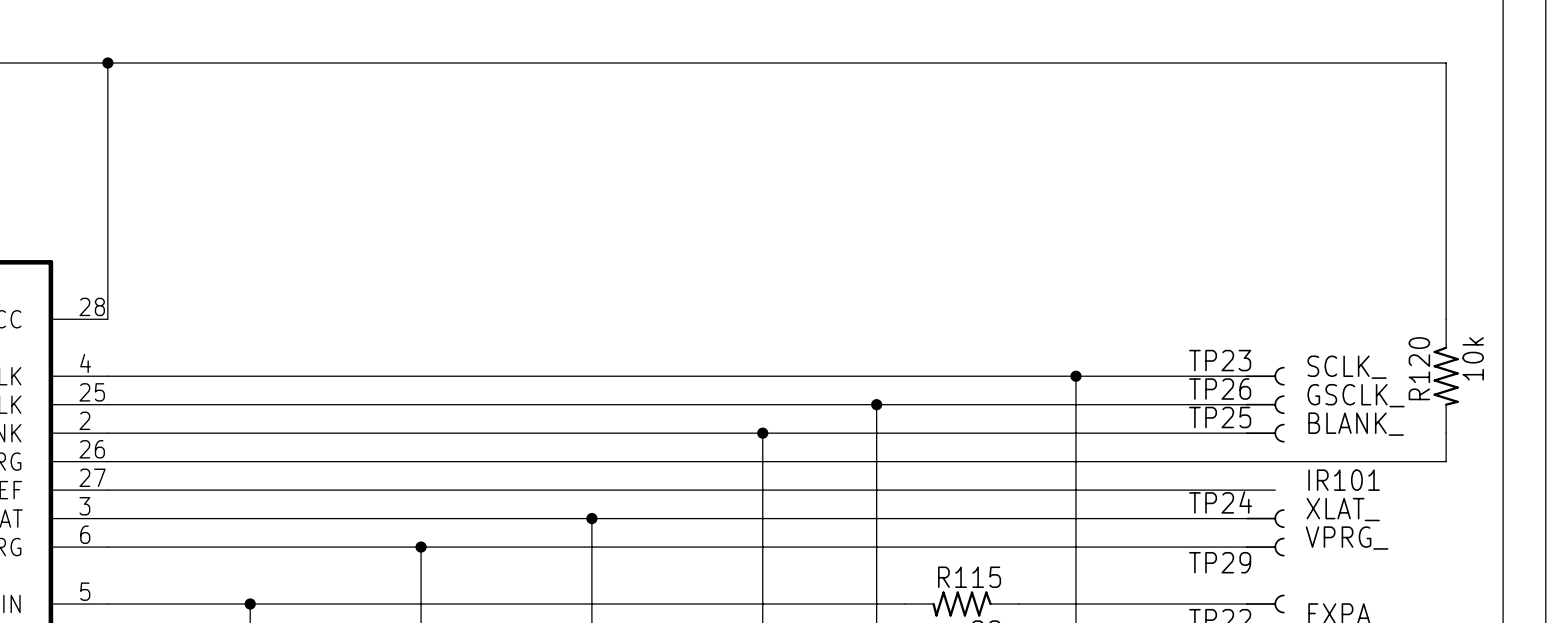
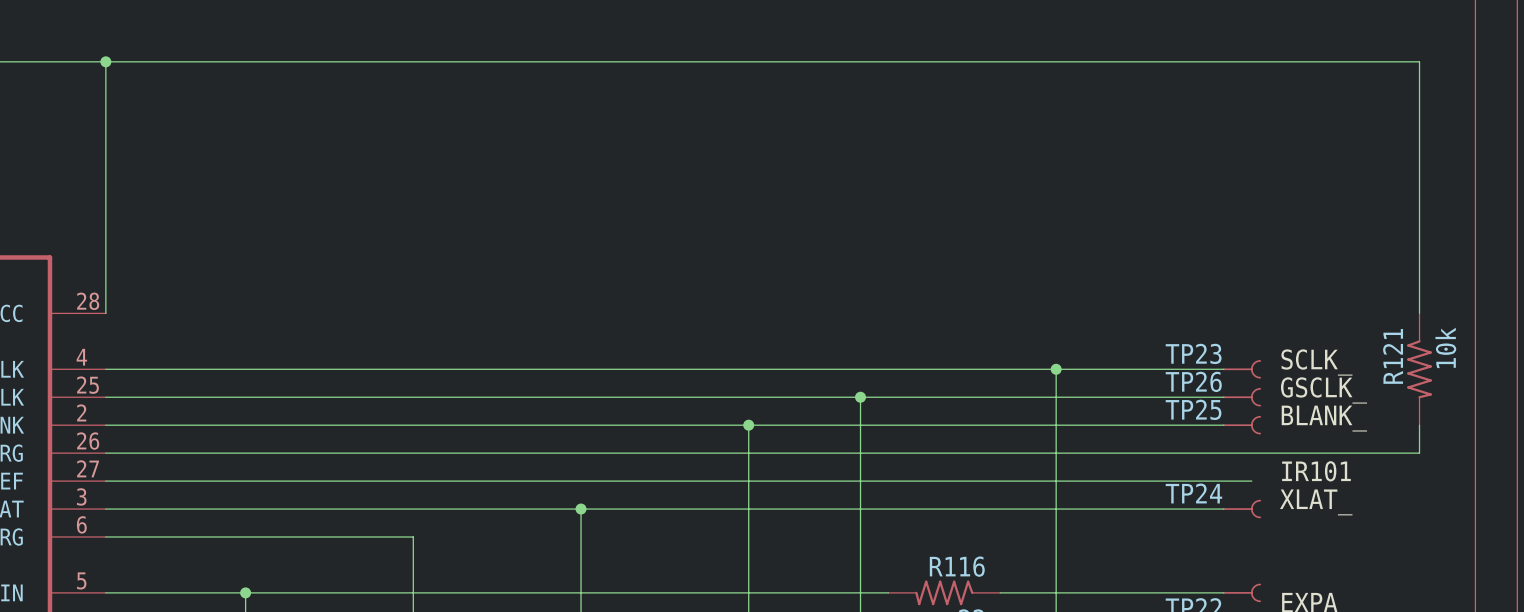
R120 name: R120 (1419, 368) -> R121 (1393, 356)
label: VPRG_ (1347, 538) -> none
wire: (421, 547) (1246, 547) -> none
junction: (421, 547) -> none
TP29: (1265, 547) -> none
R115 name: R115 (969, 577) -> R116 (957, 566)

